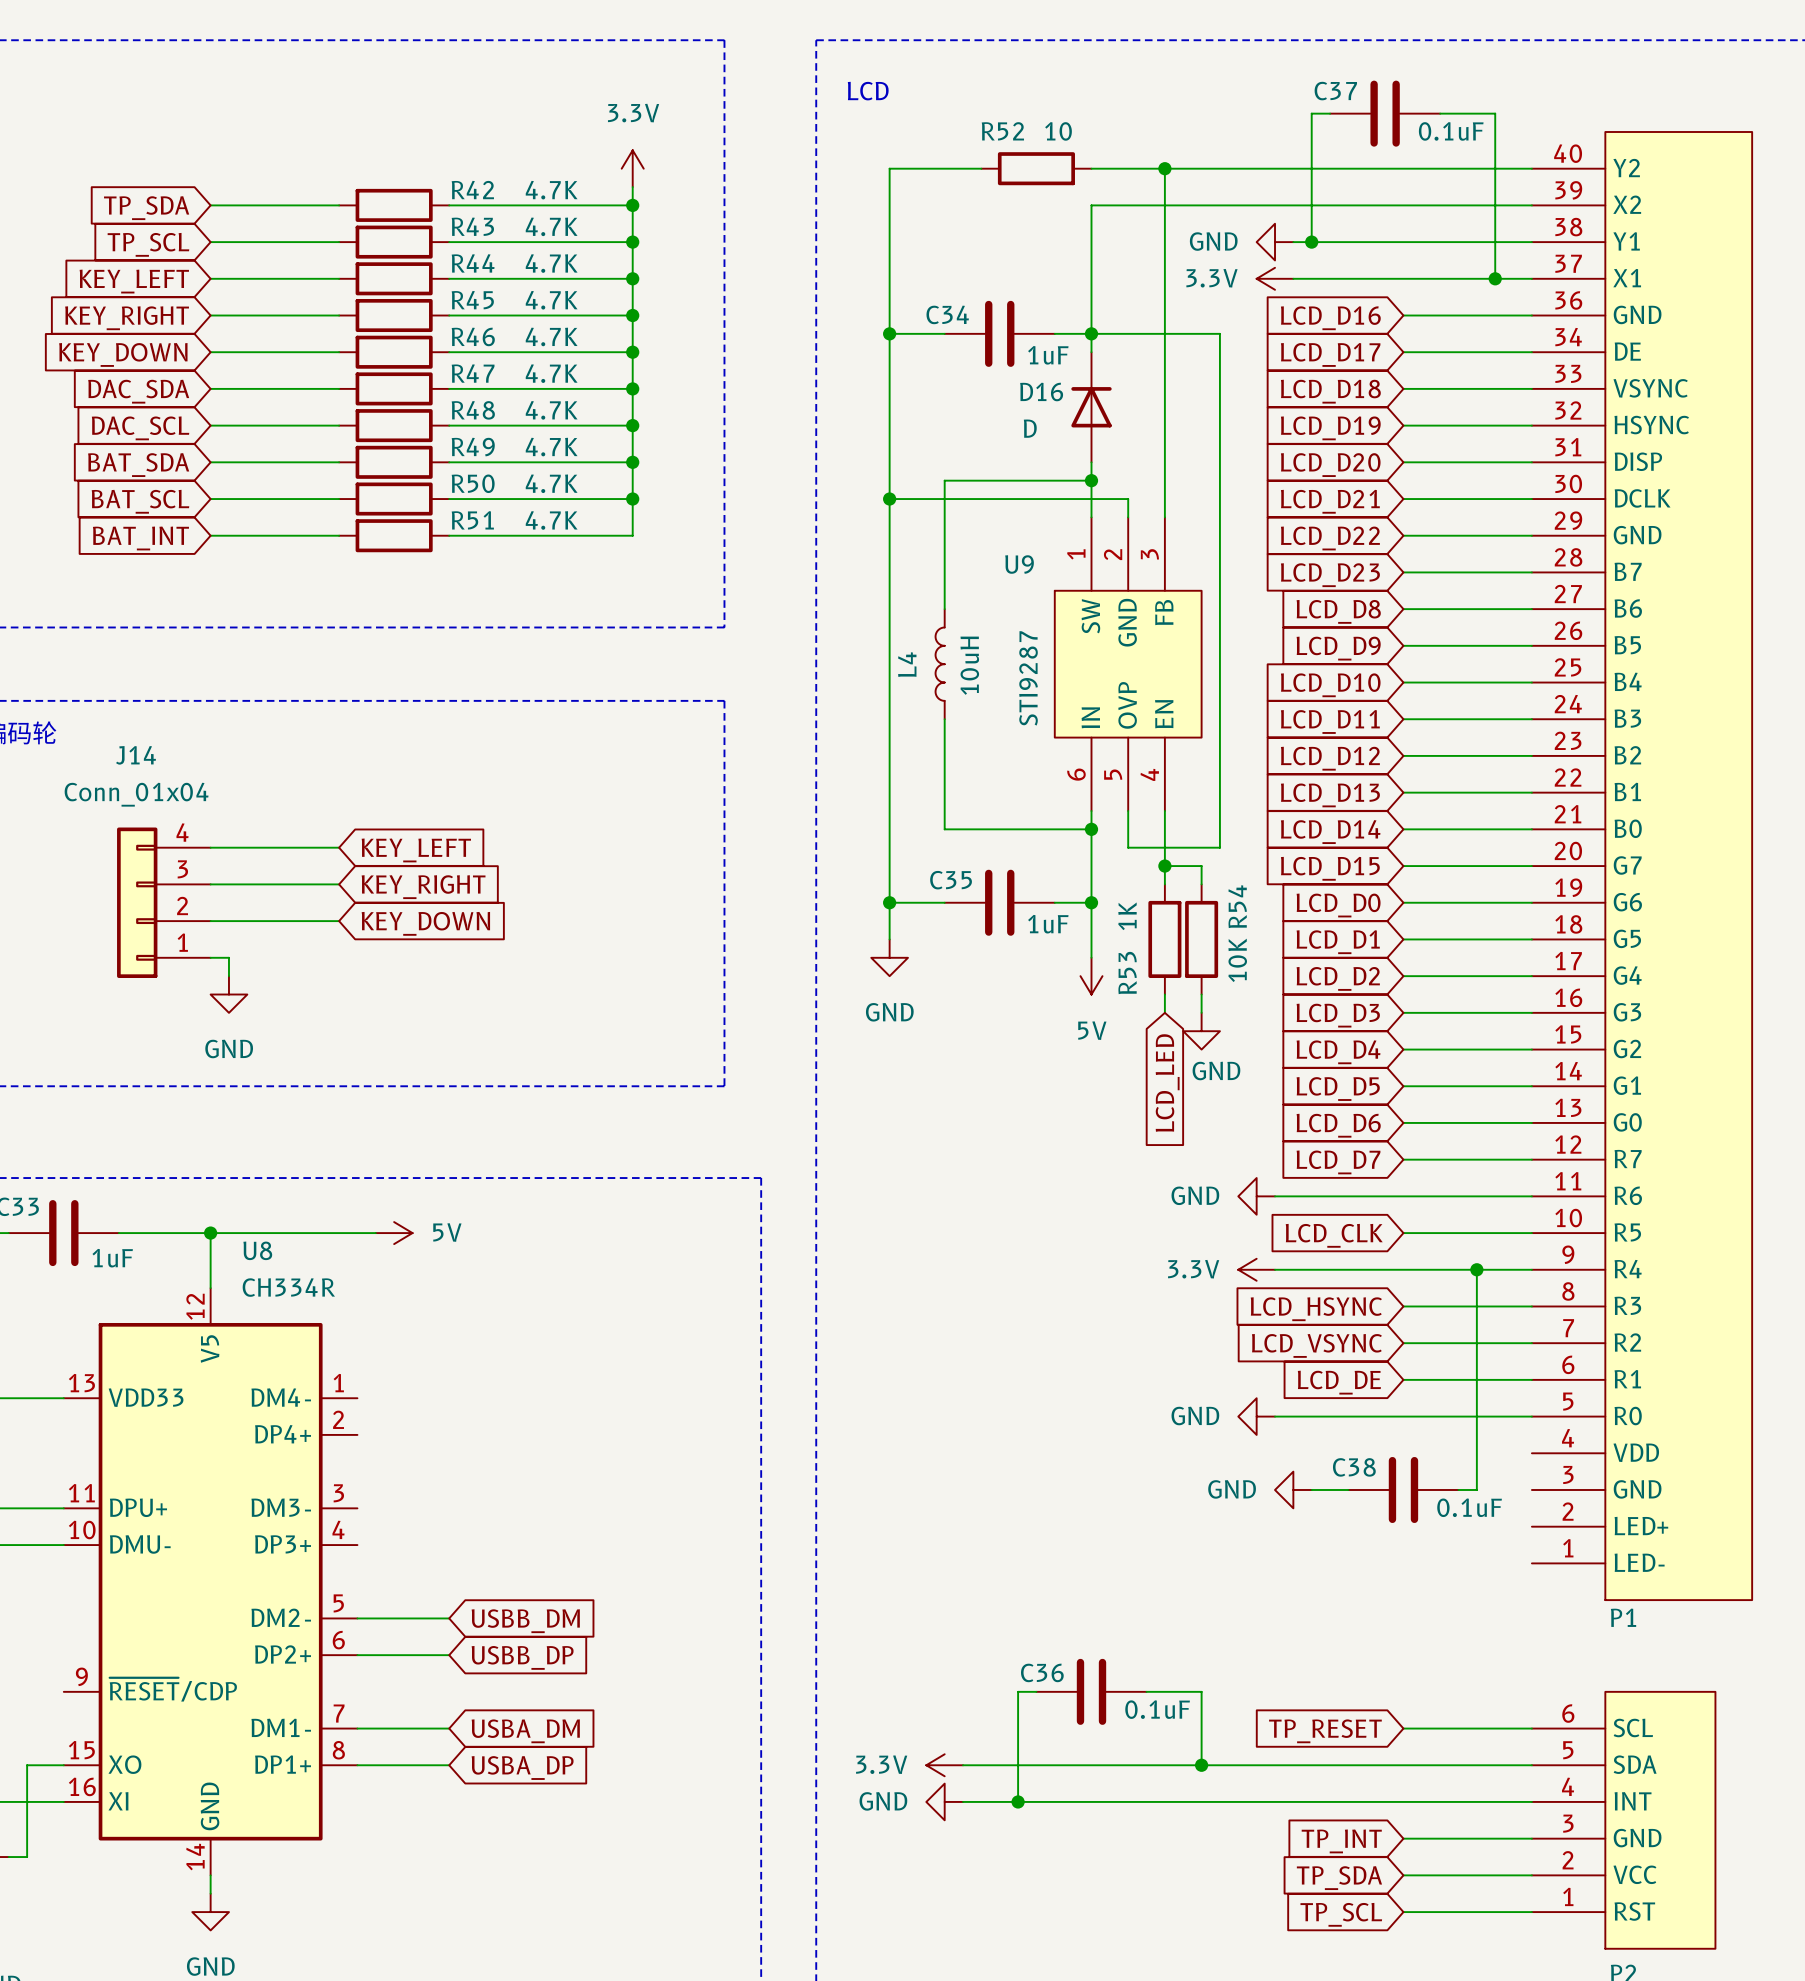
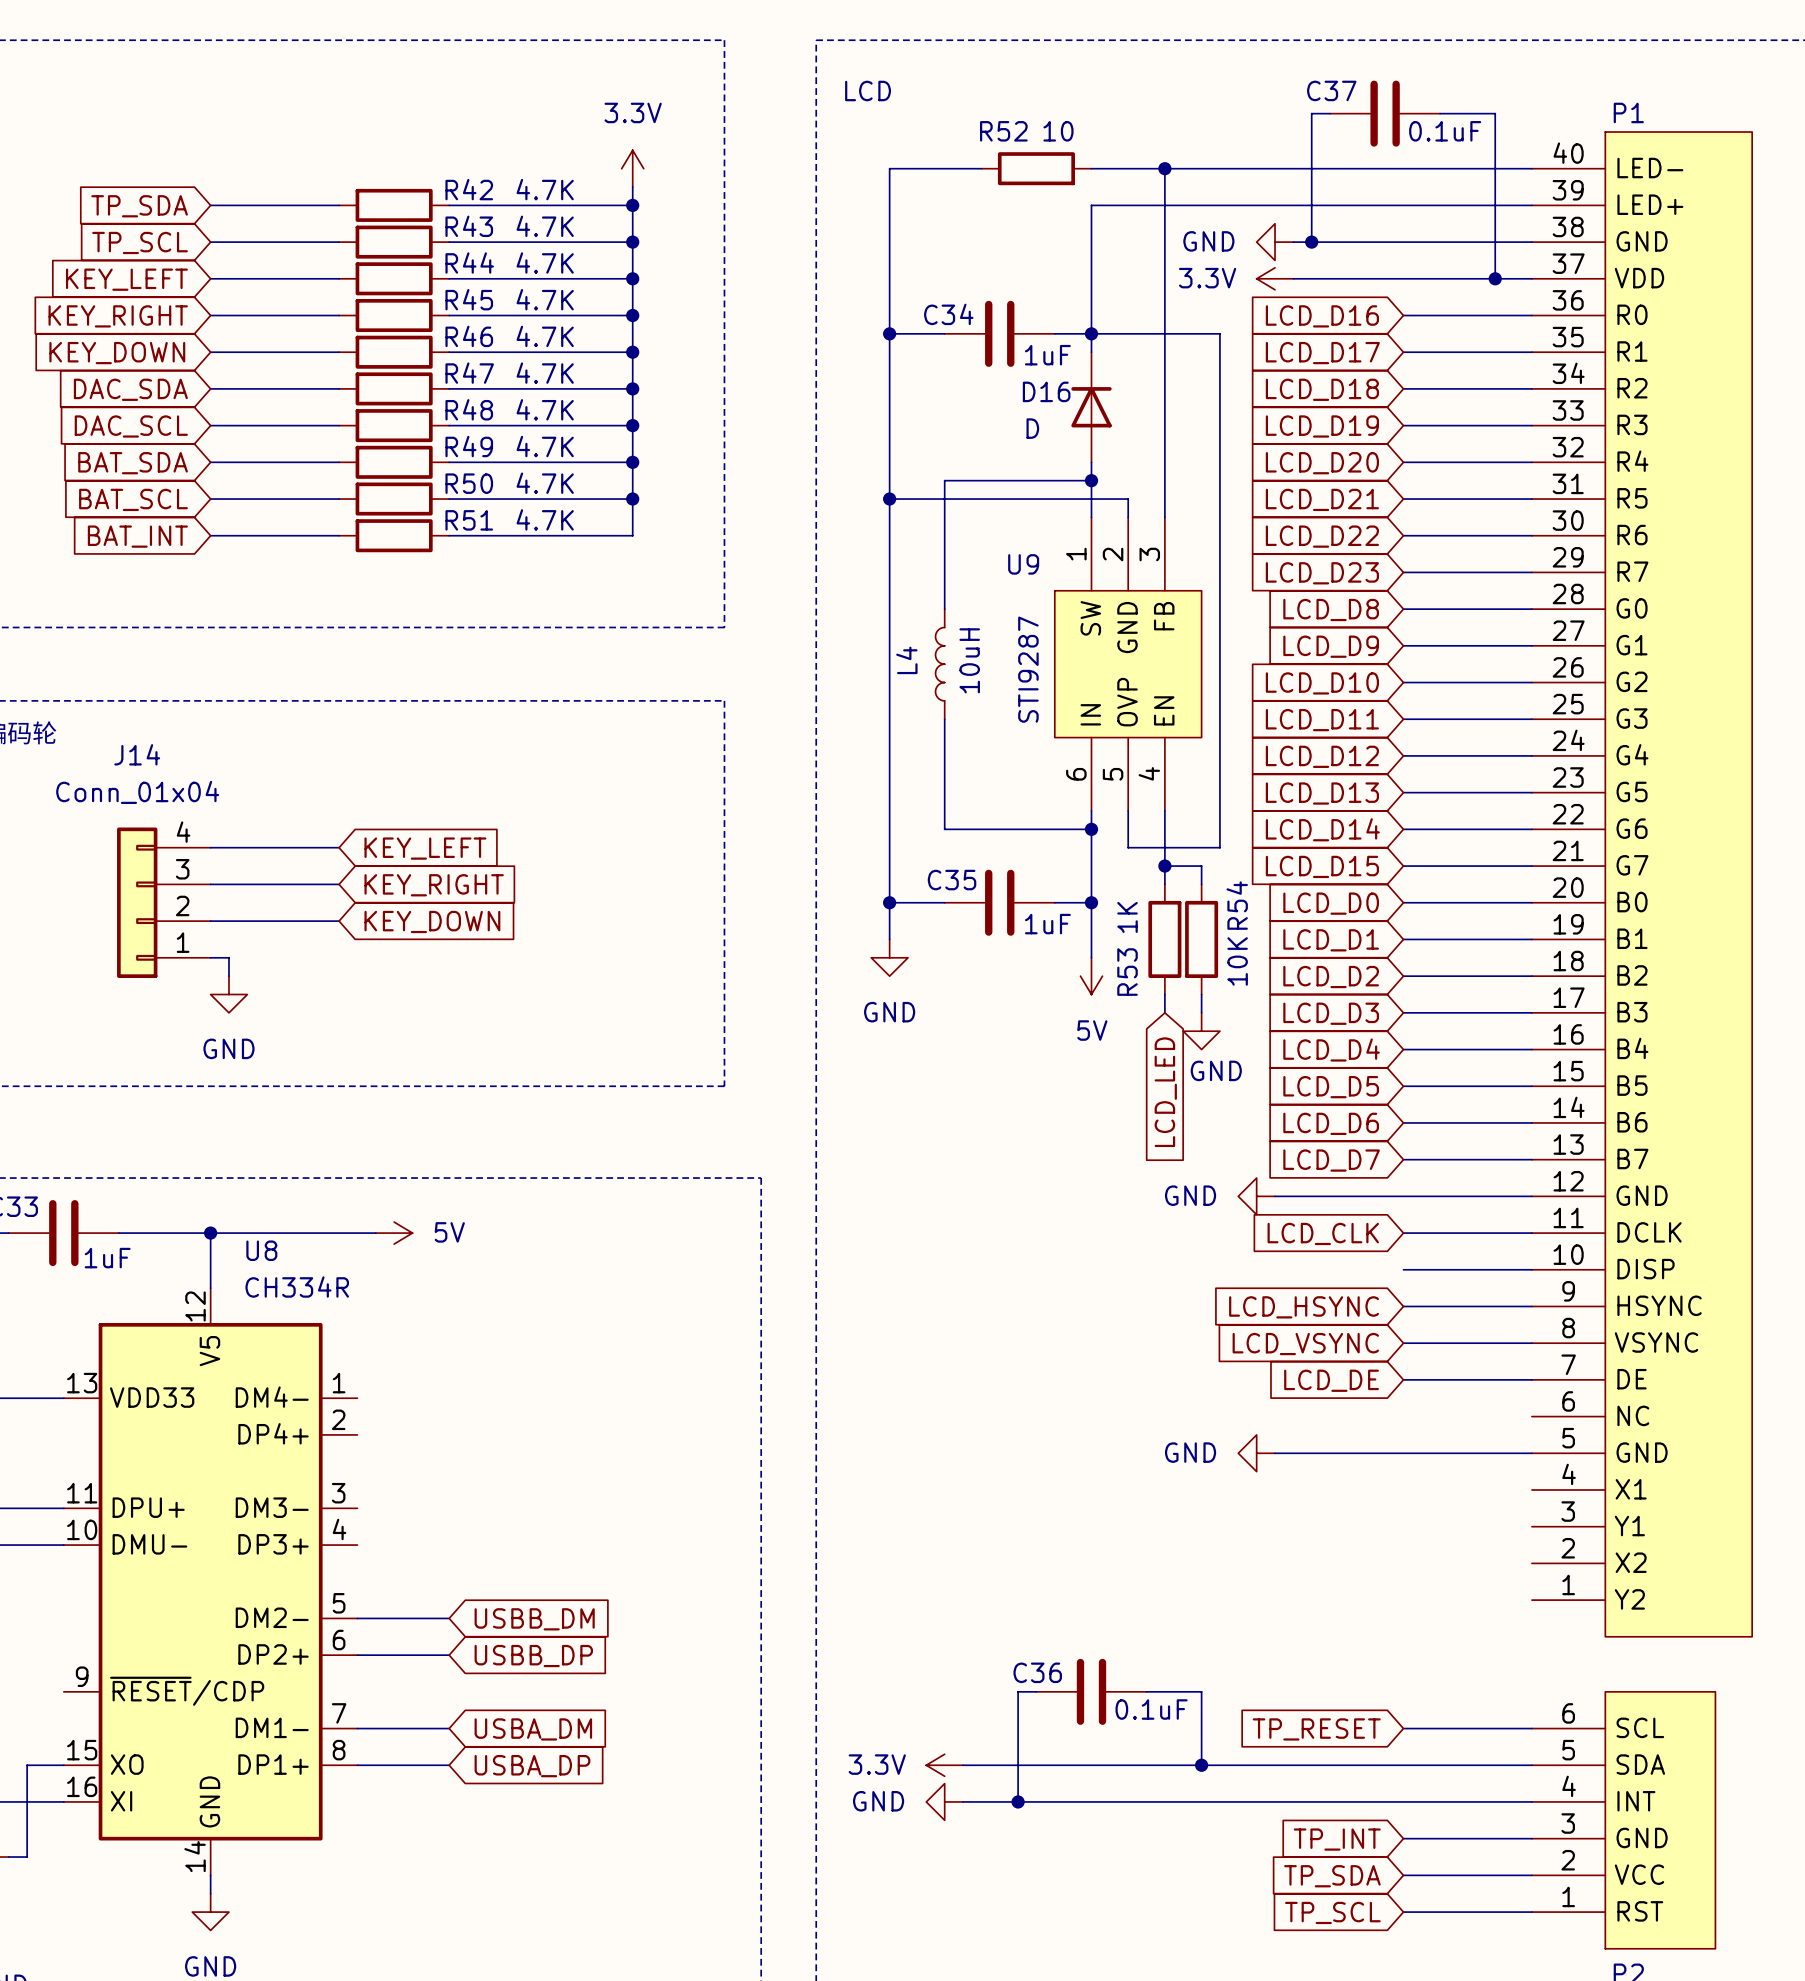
P1 symbol: [1531, 131, 1753, 1601] -> [1531, 131, 1753, 1637]
power symbol: 3.3V (1256, 1269) -> none
wire: (1275, 1269) (1403, 1269) -> none
wire: (1476, 1269) (1476, 1489) (1458, 1489) -> none
junction: (1476, 1269) -> none
power symbol: GND (1256, 1416) -> none
wire: (1275, 1416) (1531, 1416) -> (1275, 1453) (1531, 1453)
power symbol: none -> GND (1256, 1453)
power symbol: GND (1293, 1489) -> none
wire: (1311, 1489) (1348, 1489) -> none
C38: 0.1uF (1403, 1489) -> none
P1 name position: P1 (1623, 1617) -> P1 (1628, 112)

